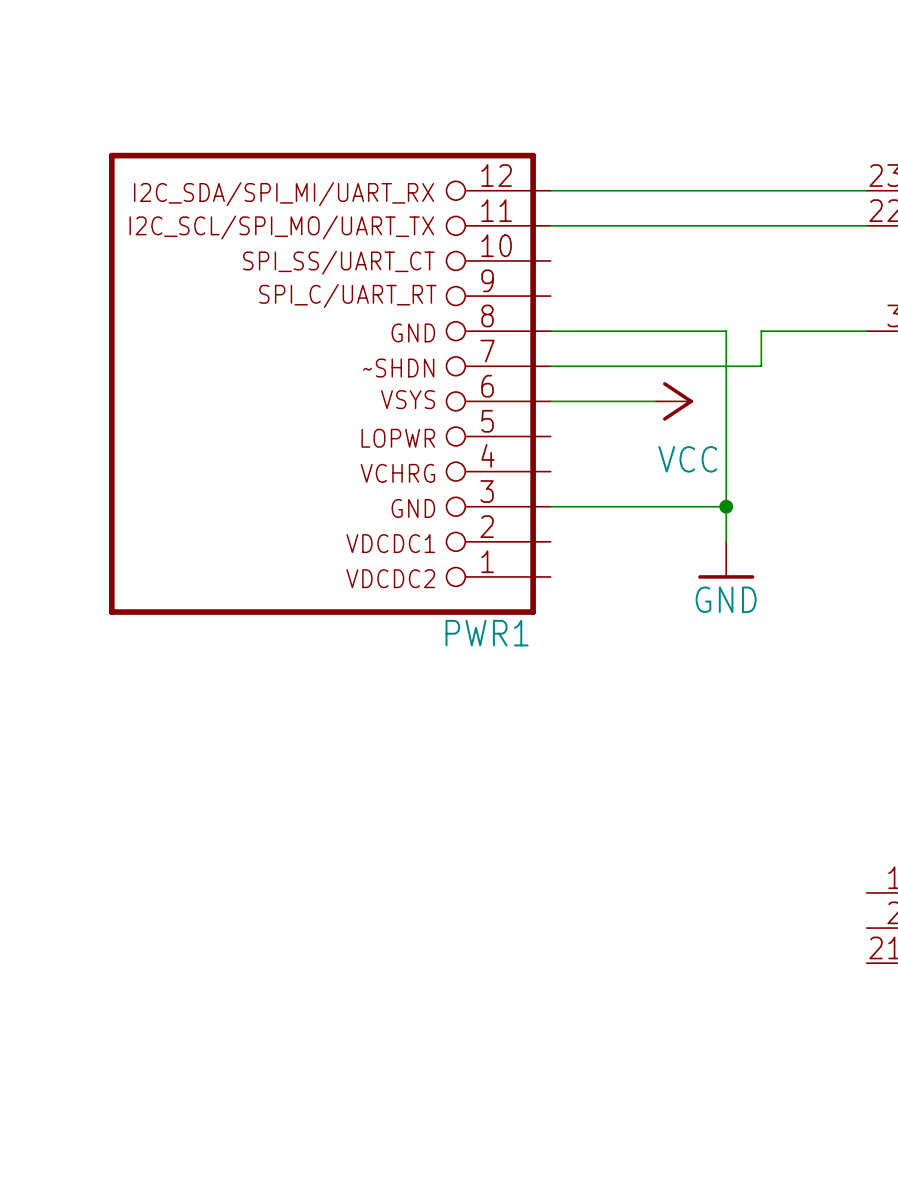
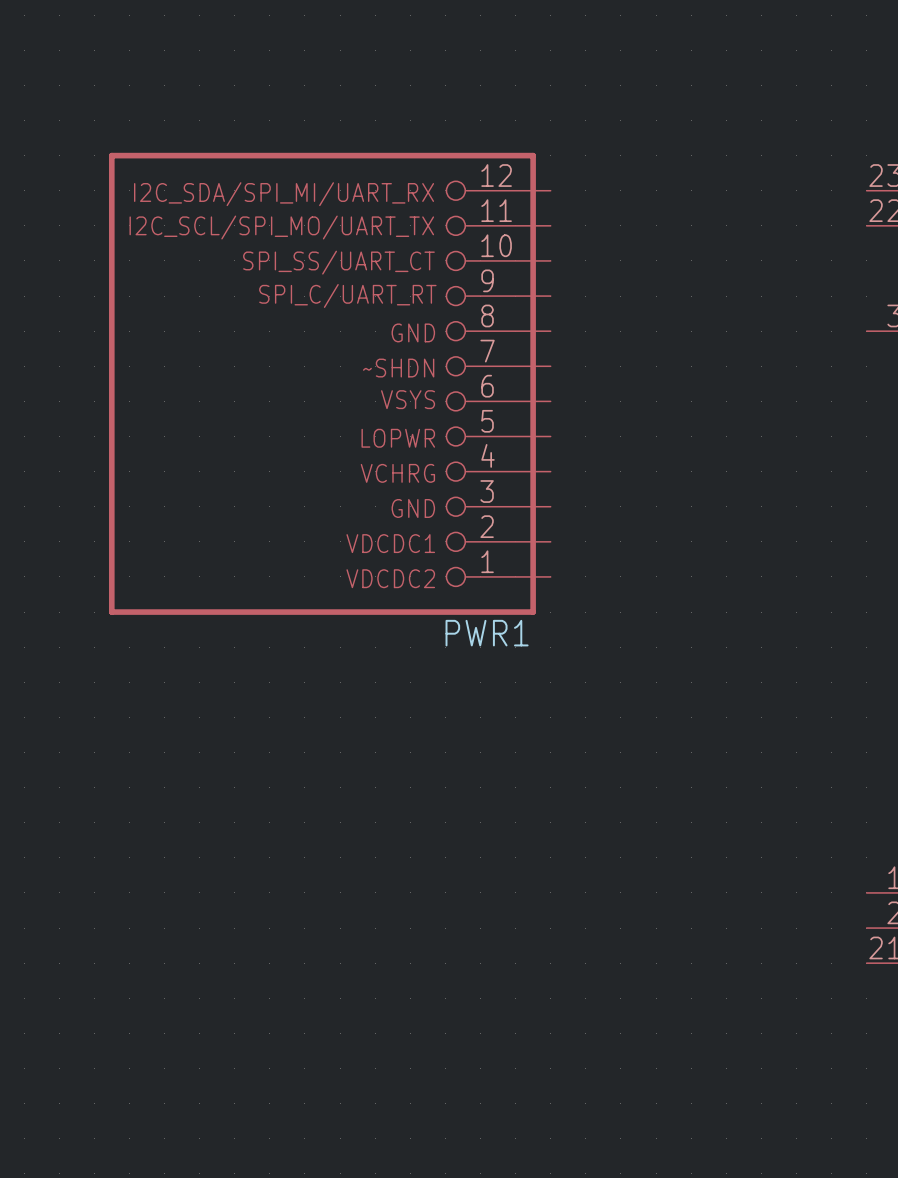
wire: (550, 190) (866, 190) -> none
wire: (550, 225) (866, 225) -> none
wire: (550, 331) (726, 331) (726, 541) -> none
wire: (866, 331) (761, 331) (761, 366) (550, 366) -> none
wire: (550, 401) (656, 401) -> none
power symbol: VCC (674, 401) -> none
wire: (550, 506) (726, 506) -> none
junction: (726, 506) -> none
power symbol: GND (726, 560) -> none

